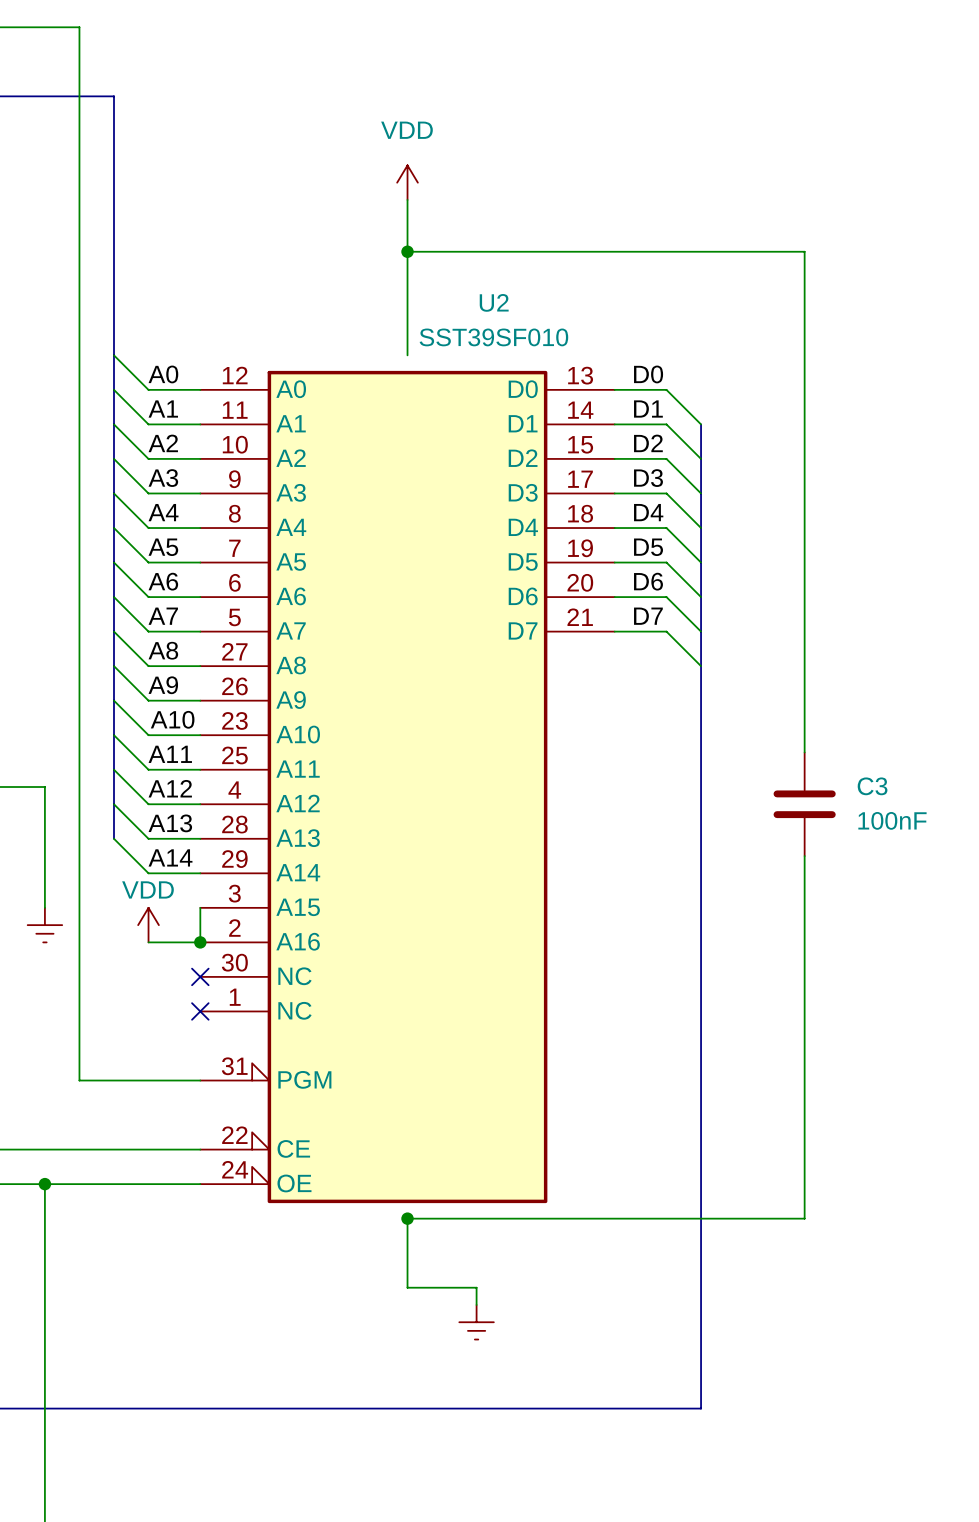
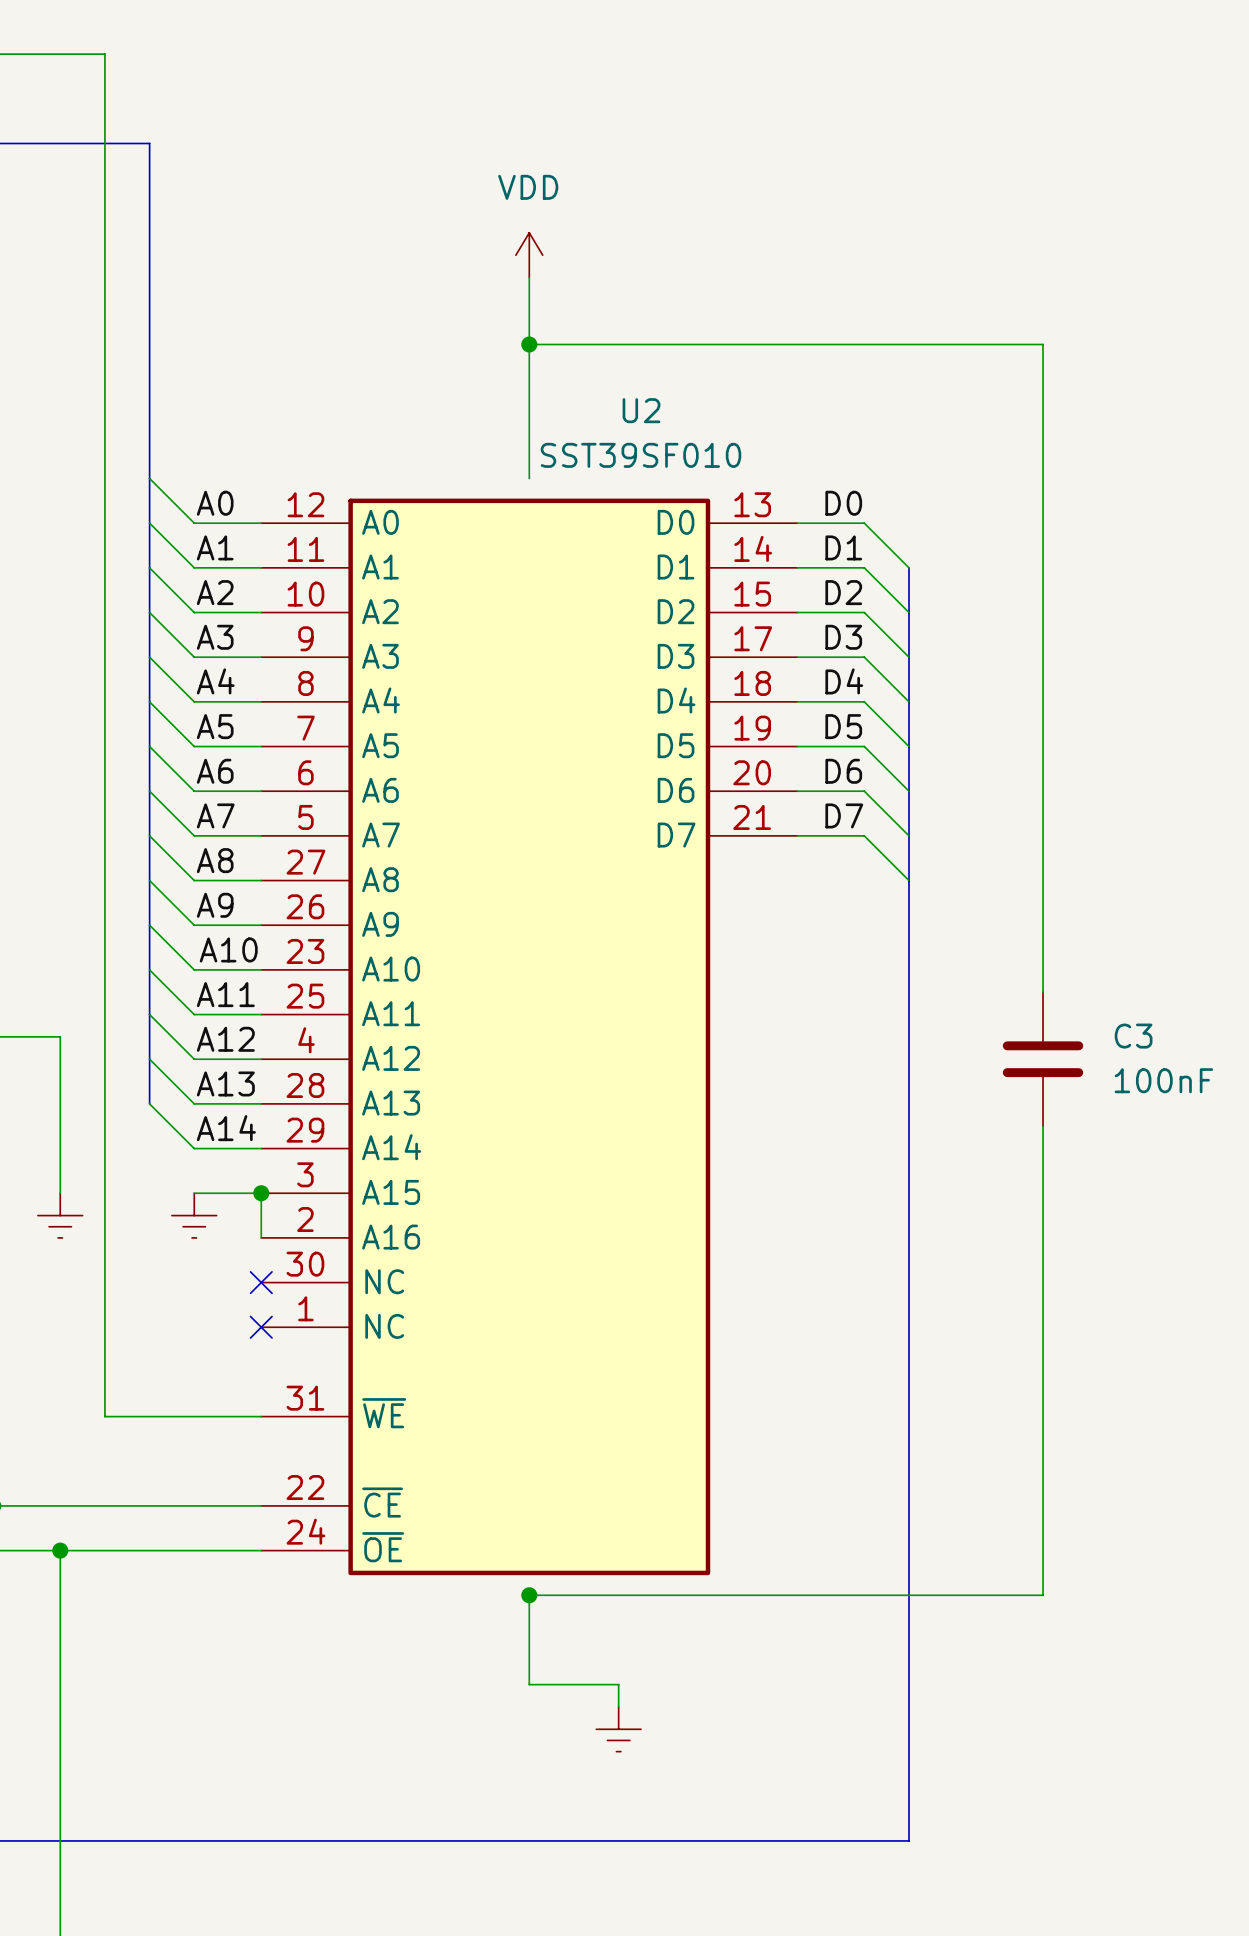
U2 symbol: [200, 370, 615, 1204] -> [261, 498, 798, 1576]
power symbol text: VDD (147, 889) -> none
power symbol shape: [138, 907, 159, 943] -> [171, 1193, 217, 1238]
wire: (148, 942) (200, 942) -> (194, 1193) (261, 1193)
junction position: (200, 942) -> (261, 1193)

